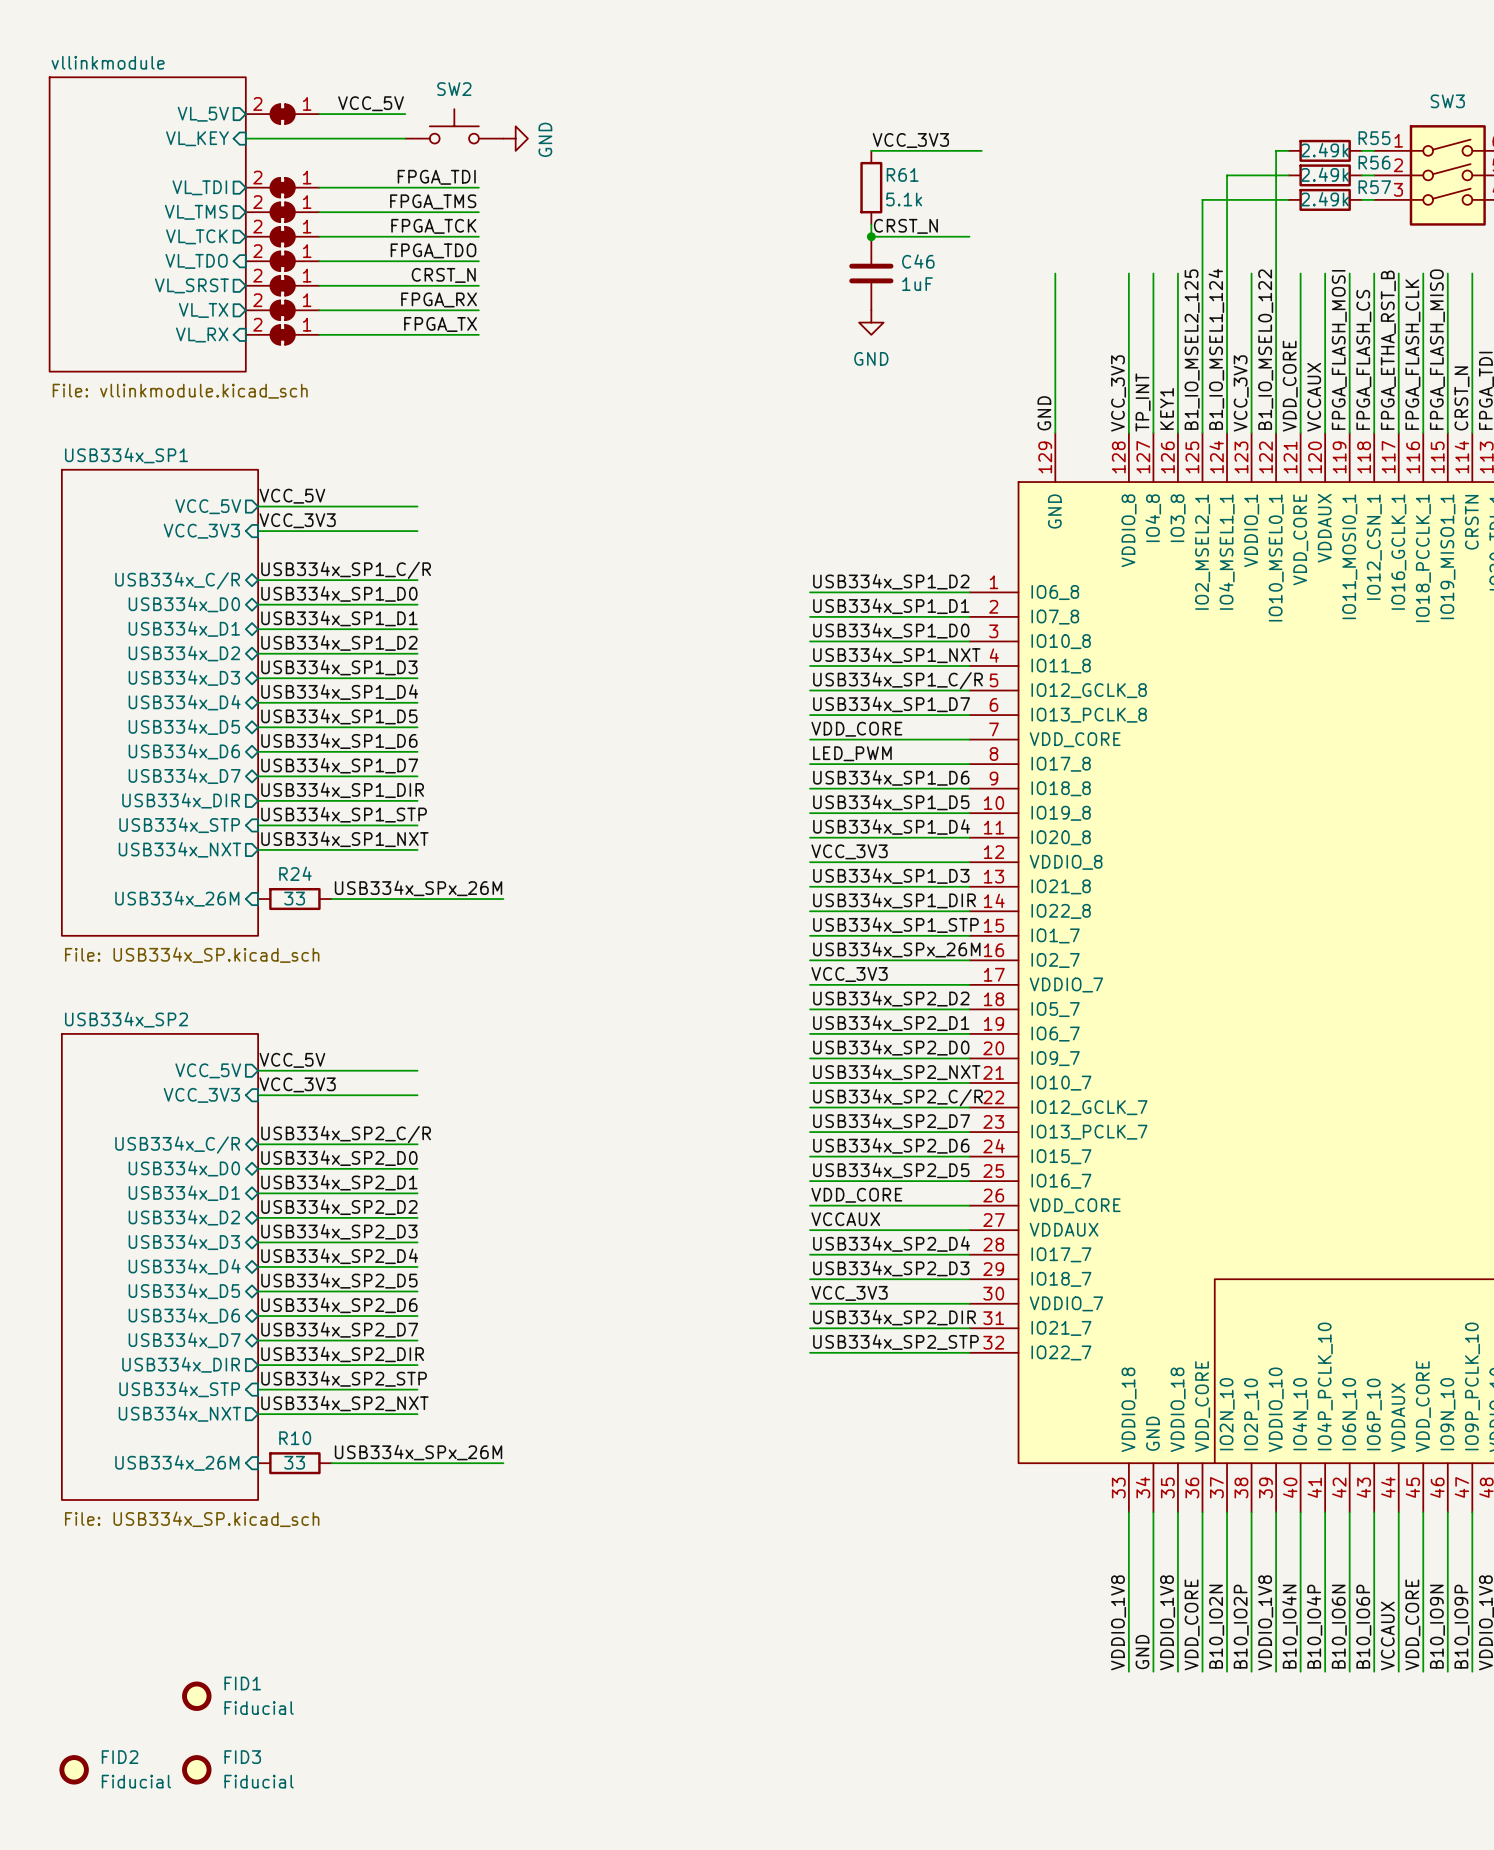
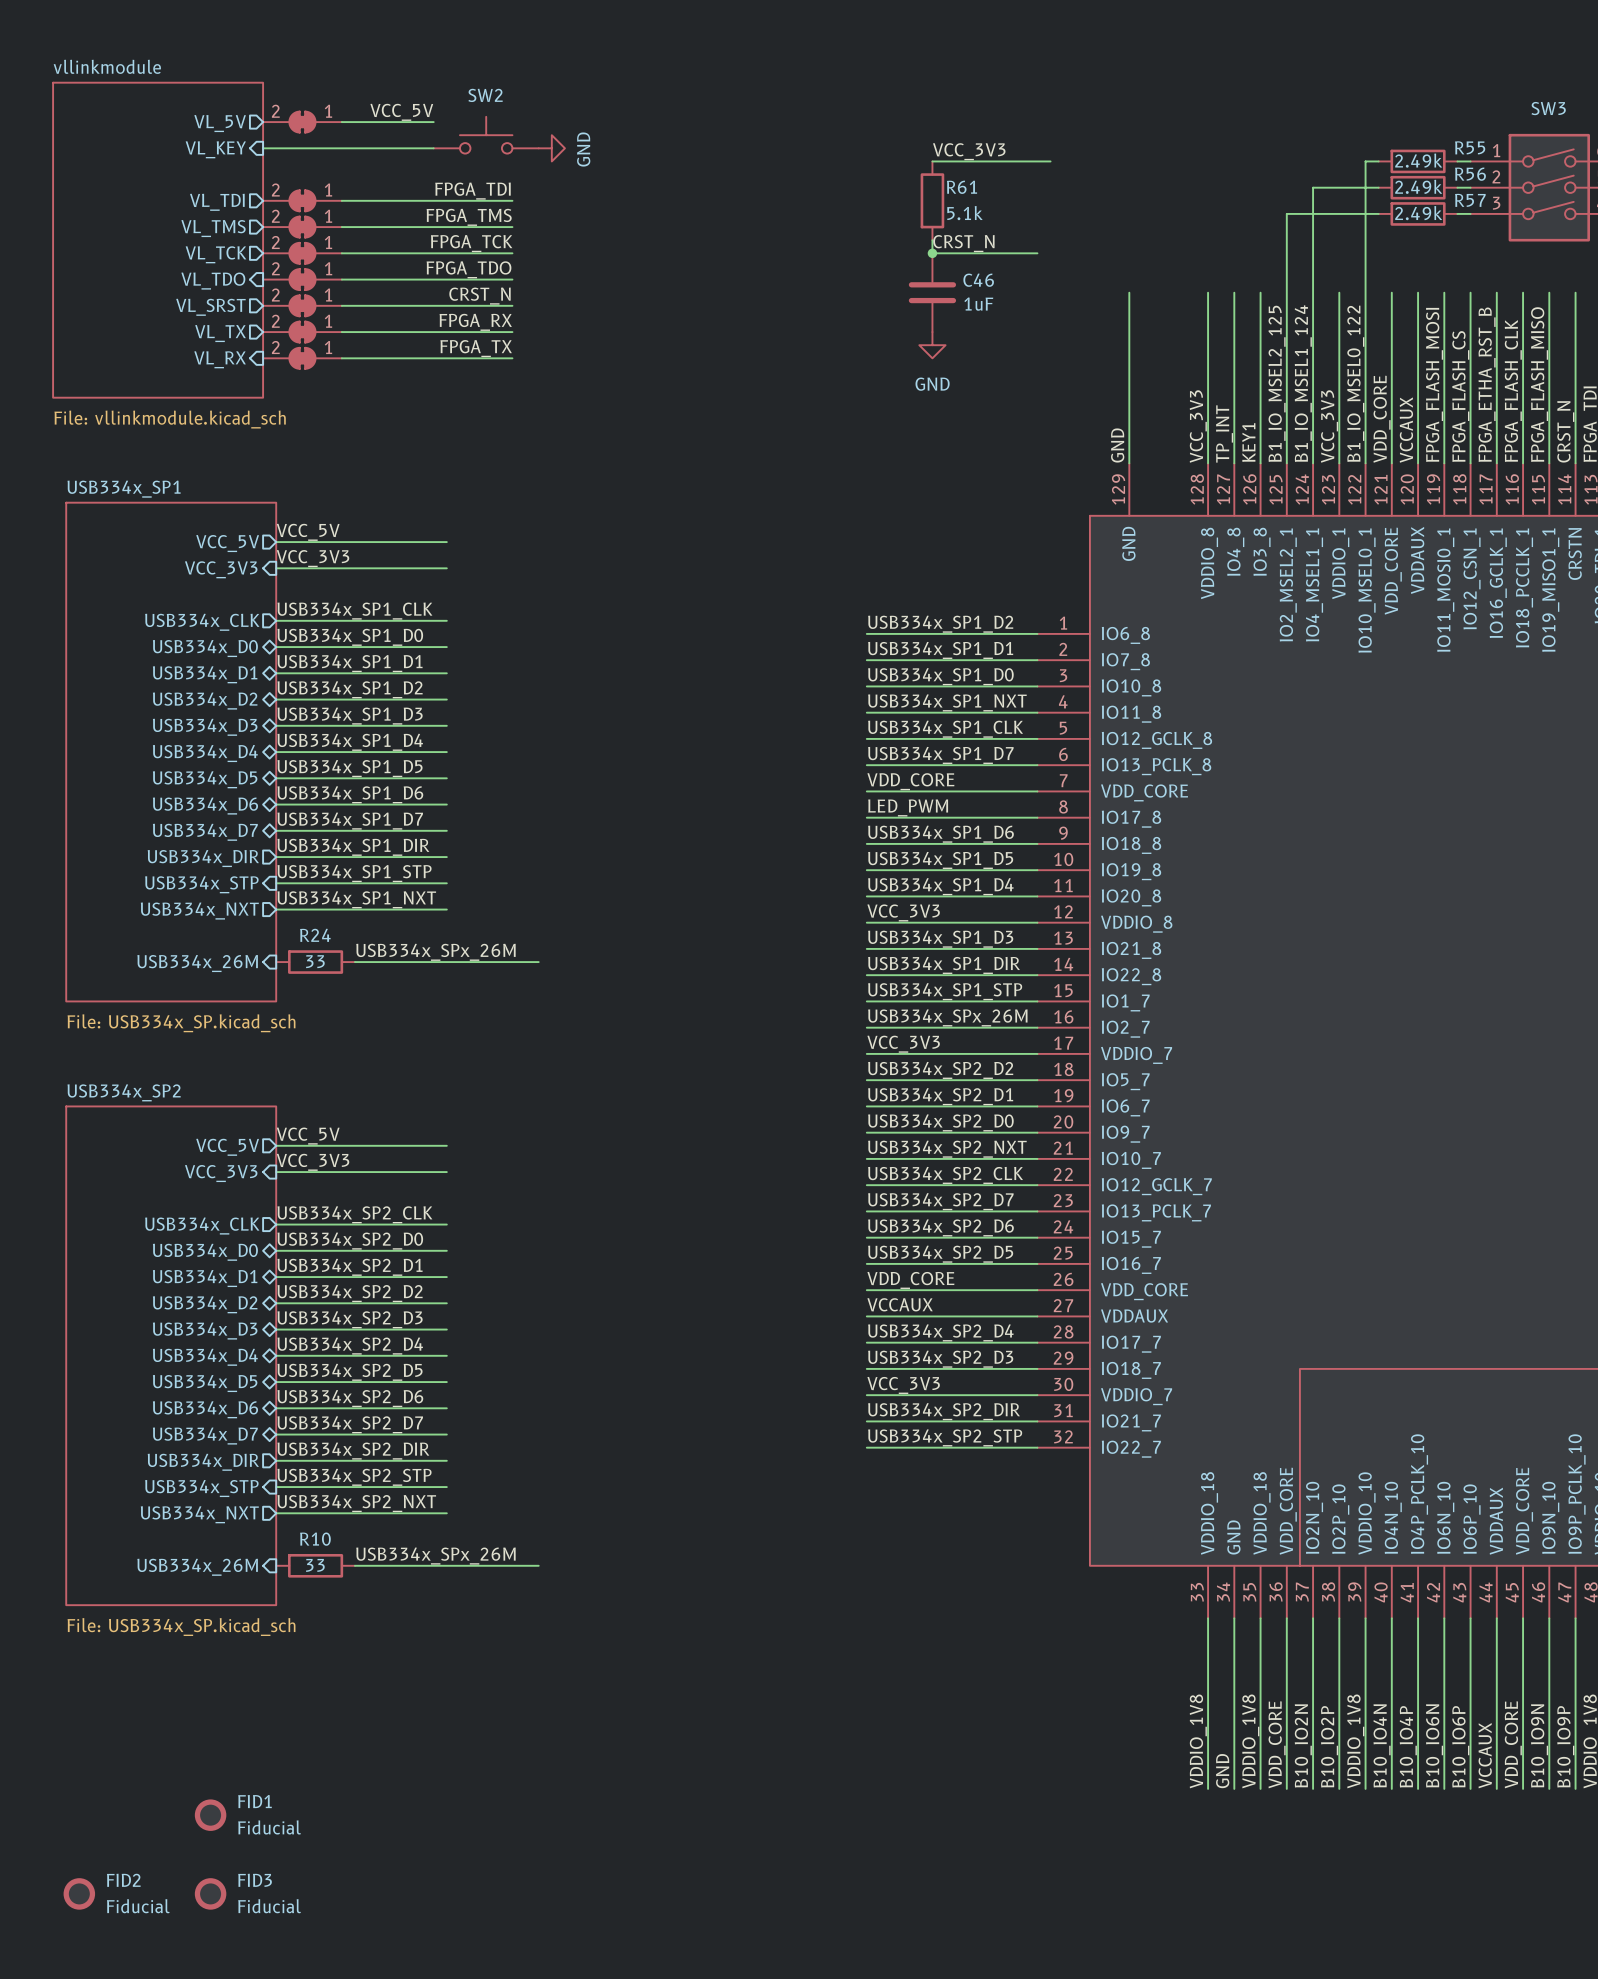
label: USB334x_SP1_C/R (346, 570) -> USB334x_SP1_CLK (354, 611)
sheet pin shape: bidirectional (177, 580) -> output (202, 622)
sheet pin: USB334x_C/R (177, 580) -> USB334x_CLK (202, 622)
label: USB334x_SP1_C/R (898, 680) -> USB334x_SP1_CLK (945, 729)
label: USB334x_SP2_C/R (898, 1097) -> USB334x_SP2_CLK (945, 1175)
label: USB334x_SP2_C/R (346, 1134) -> USB334x_SP2_CLK (354, 1214)
sheet pin shape: bidirectional (177, 1145) -> output (202, 1226)
sheet pin: USB334x_C/R (177, 1145) -> USB334x_CLK (202, 1226)

